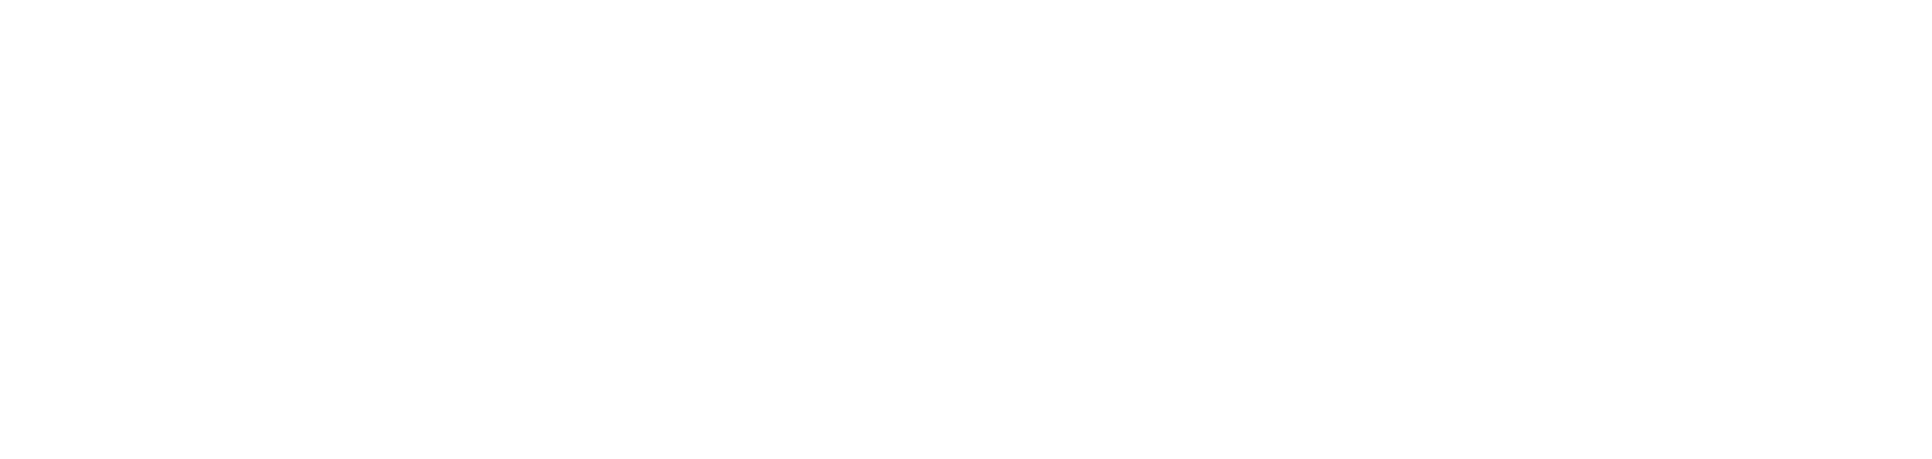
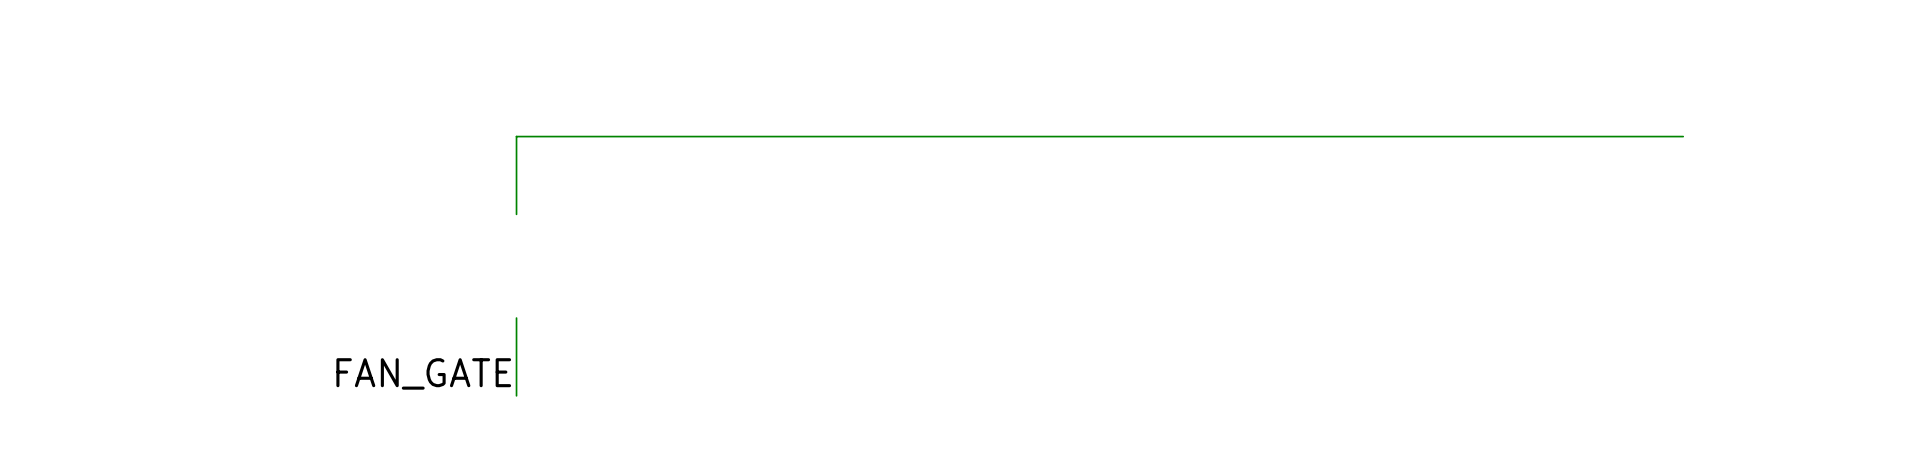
wire: none -> (1683, 136) (516, 136) (516, 214)
wire: none -> (516, 318) (516, 395)
label: none -> FAN_GATE (423, 373)

